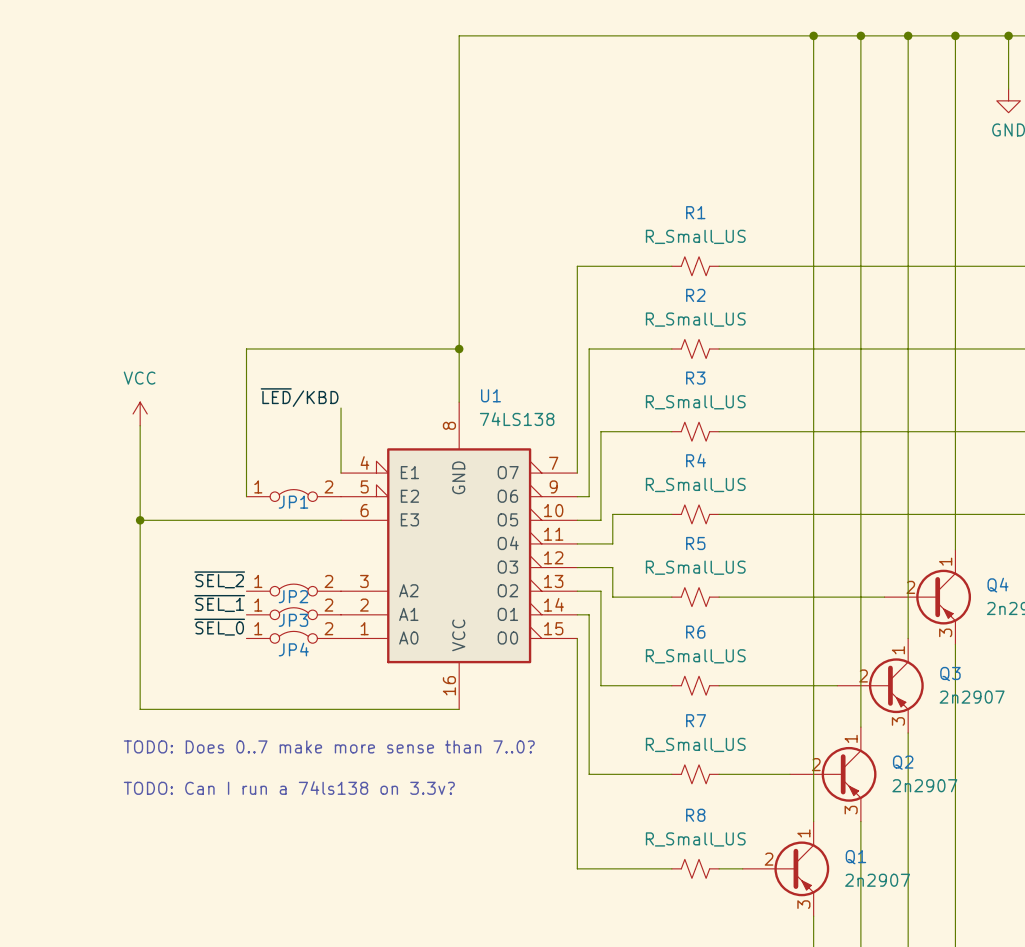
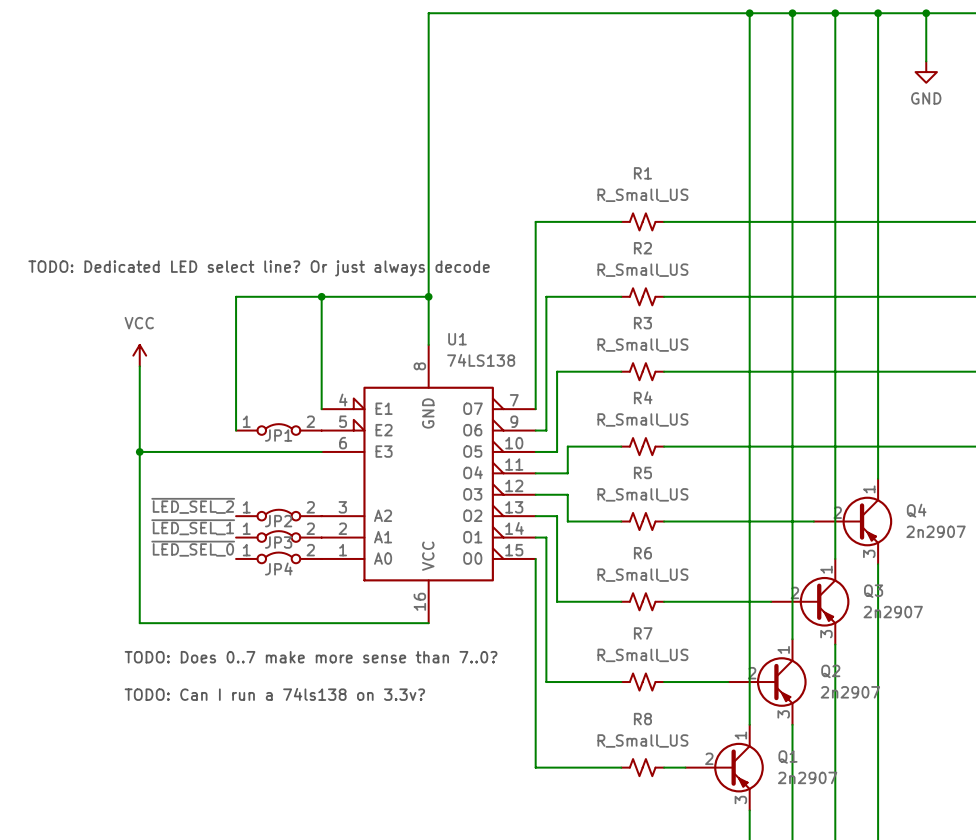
text: none -> TODO: Dedicated LED select line? Or just always decode (259, 268)
wire: none -> (321, 296) (321, 350)
junction: none -> (321, 296)
label: ~{LED}/KBD (299, 397) -> none
label: ~{SEL_2} (219, 579) -> ~{LED_SEL_2} (193, 505)
label: ~{SEL_1} (219, 603) -> ~{LED_SEL_1} (193, 527)
label: ~{SEL_0} (219, 627) -> ~{LED_SEL_0} (193, 548)

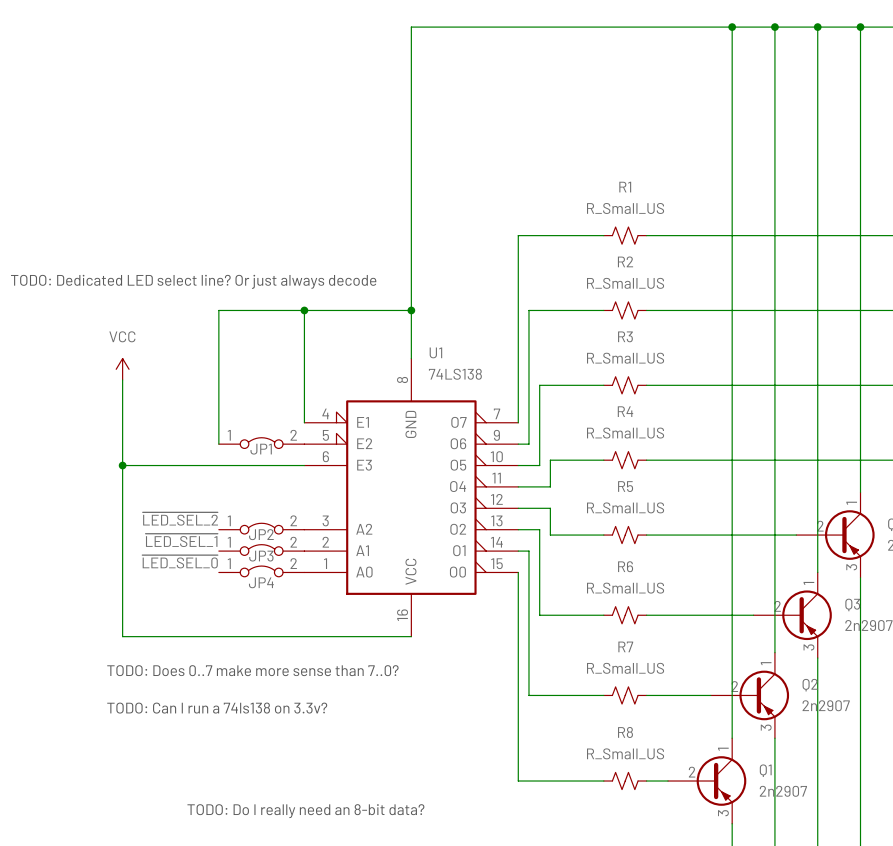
text: none -> TODO: Do I really need an 8-bit data? (305, 811)

